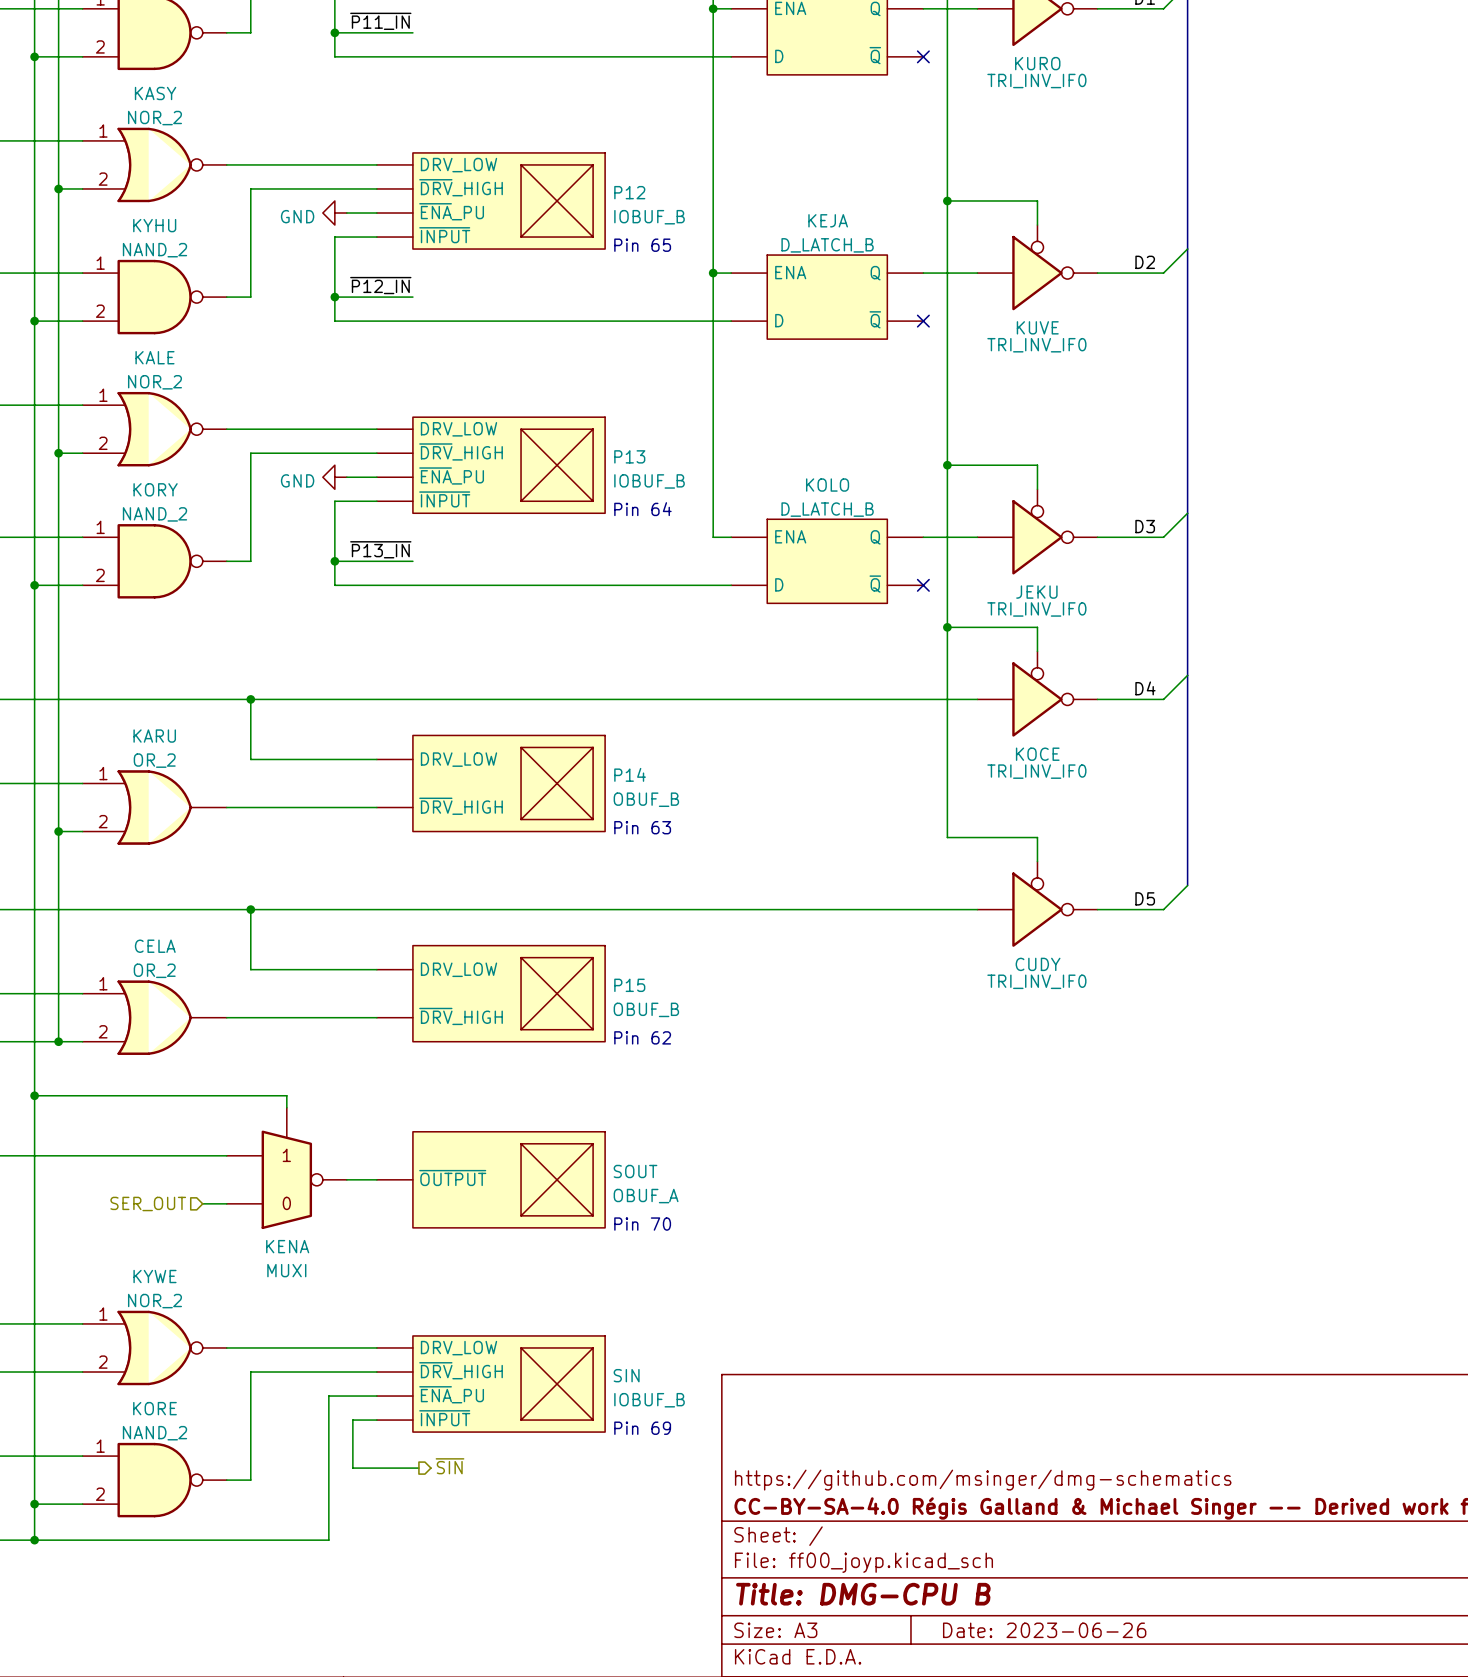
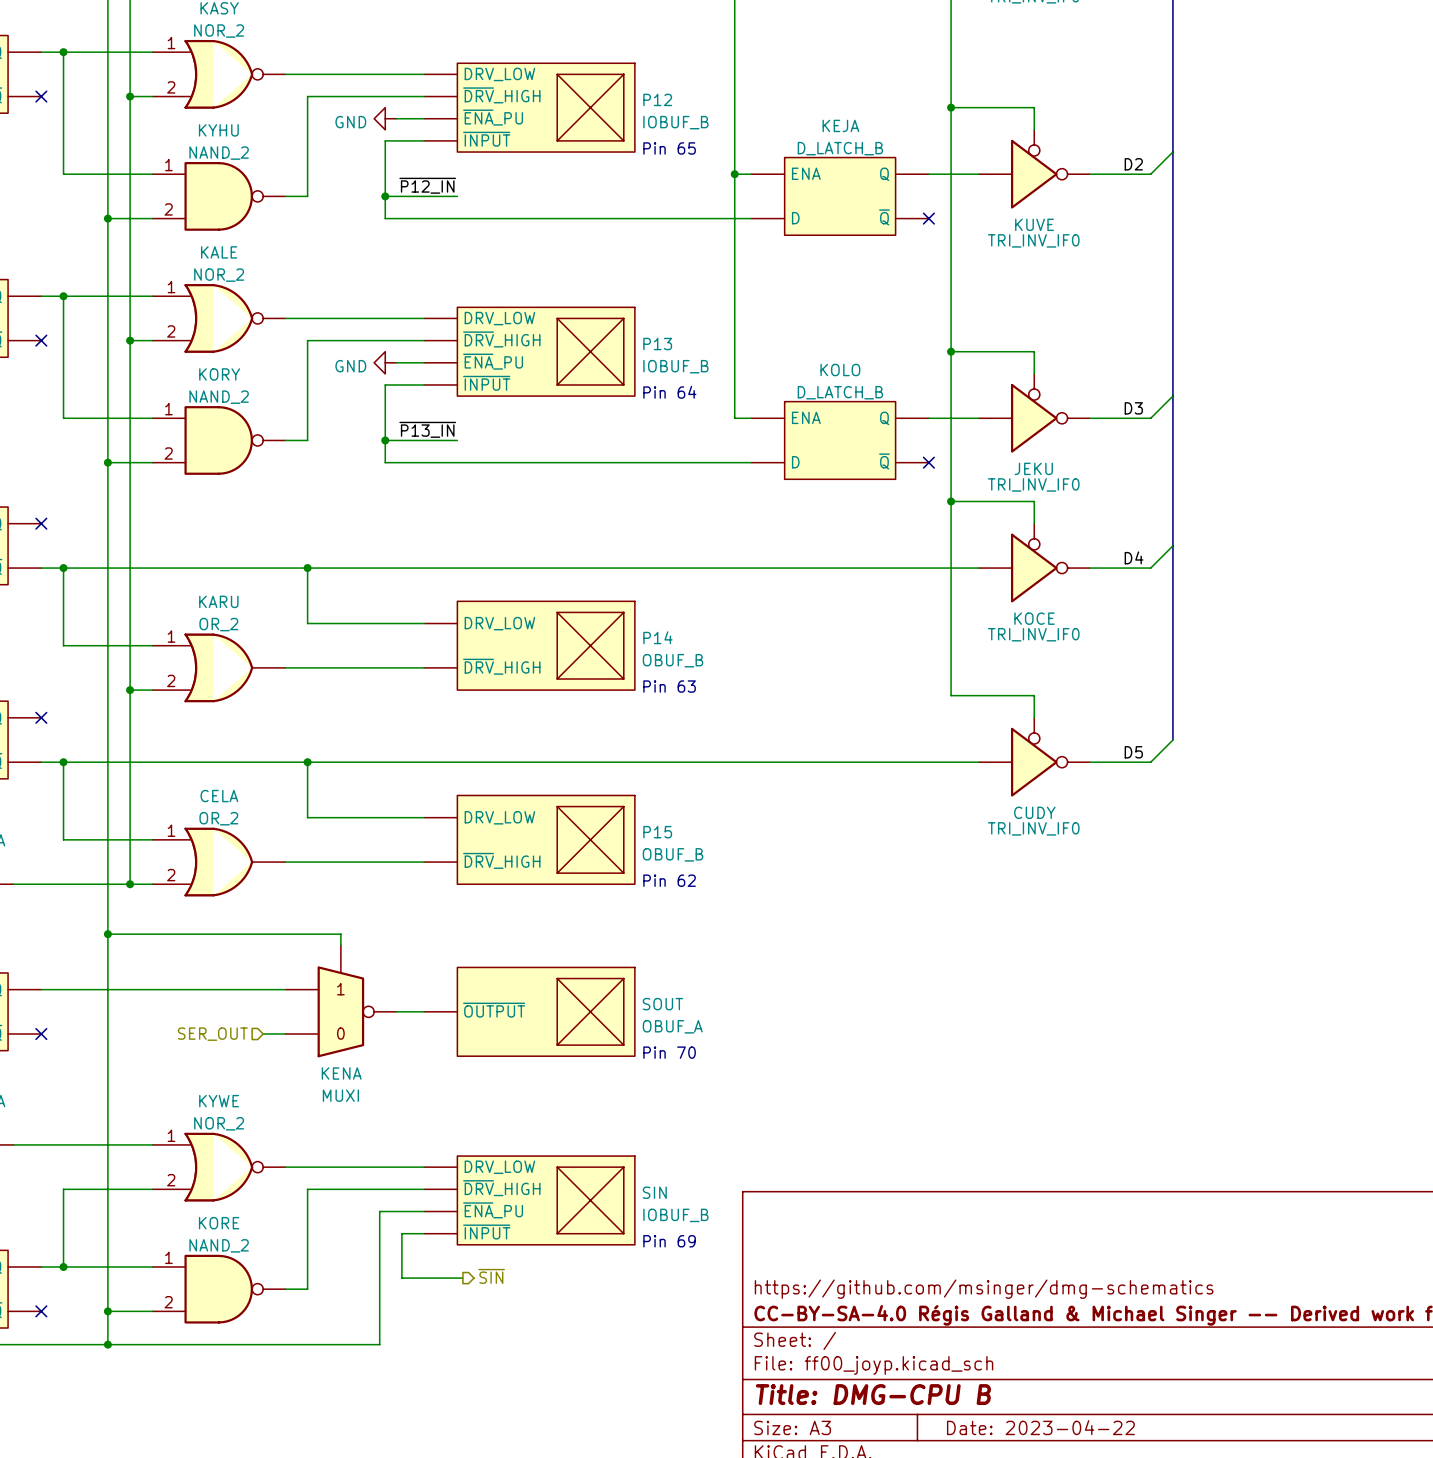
title block: Date: 2023-06-26 (1044, 1630) -> Date: 2023-04-22 (1040, 1427)

